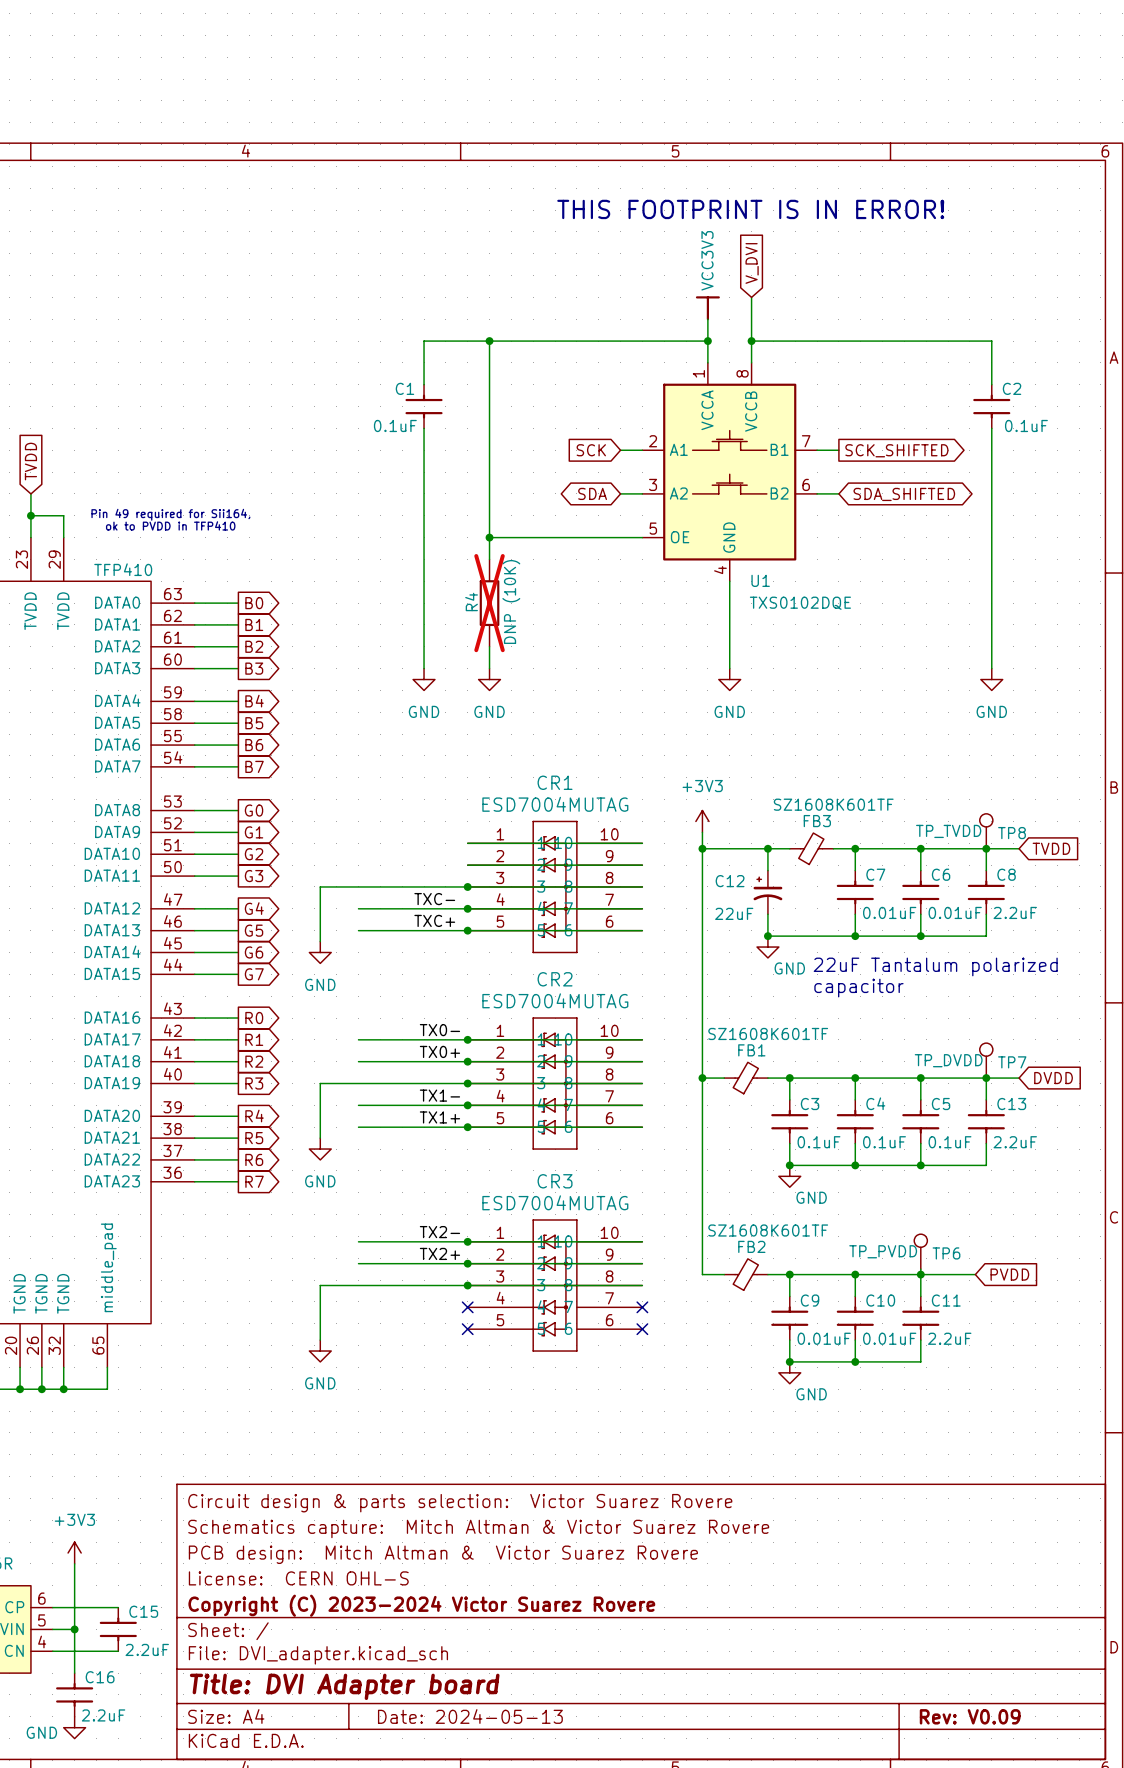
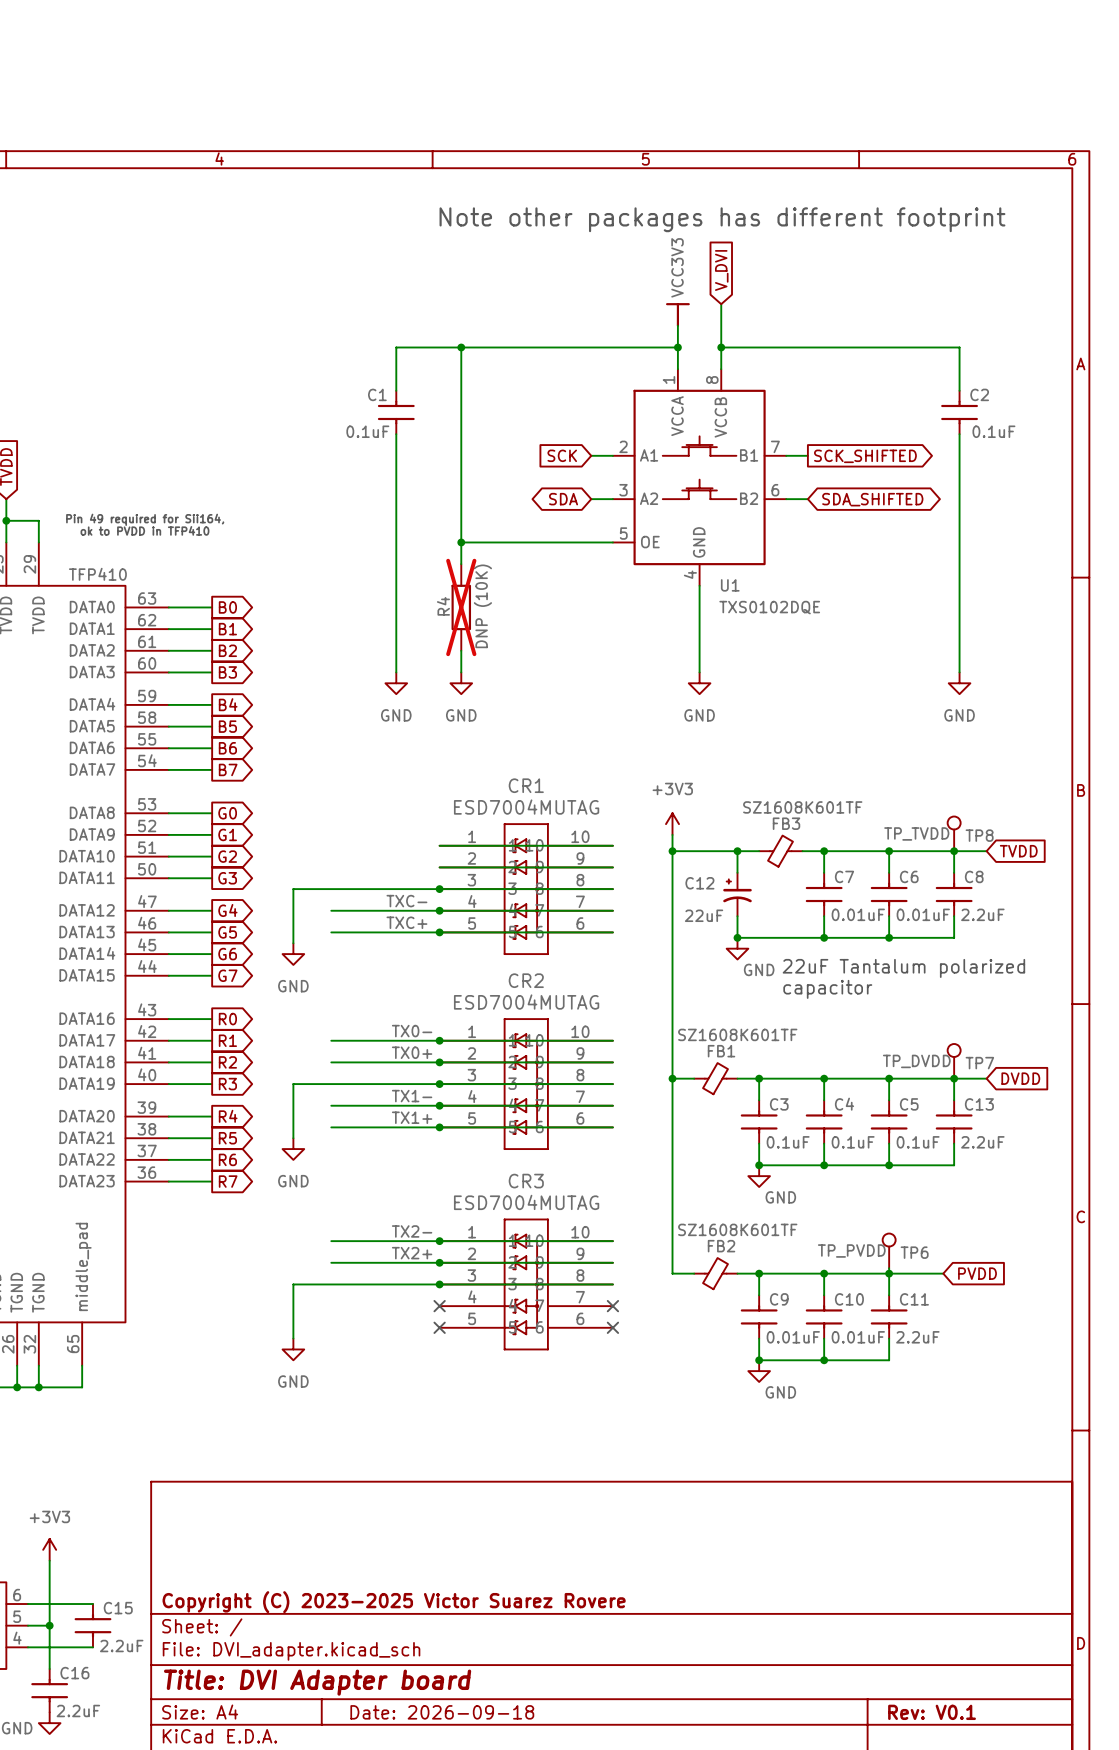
text: THIS FOOTPRINT IS IN ERROR! (750, 209) -> Note other packages has different footprint (722, 219)
title block: Circuit design & parts selection: Victor Suarez Rovere (460, 1503) -> none
title block: Schematics capture: Mitch Altman & Victor Suarez Rovere (478, 1528) -> none
title block: PCB design: Mitch Altman & Victor Suarez Rovere (443, 1554) -> none
title block: License: CERN OHL-S (298, 1578) -> none
title block: Copyright (C) 2023-2024 Victor Suarez Rovere (421, 1605) -> Copyright (C) 2023-2025 Victor Suarez Rovere (394, 1602)
title block: Date: 2024-05-13 (470, 1716) -> Date: 2026-09-18 (442, 1712)
title block: Rev: V0.09 (970, 1716) -> Rev: V0.1 (932, 1712)

